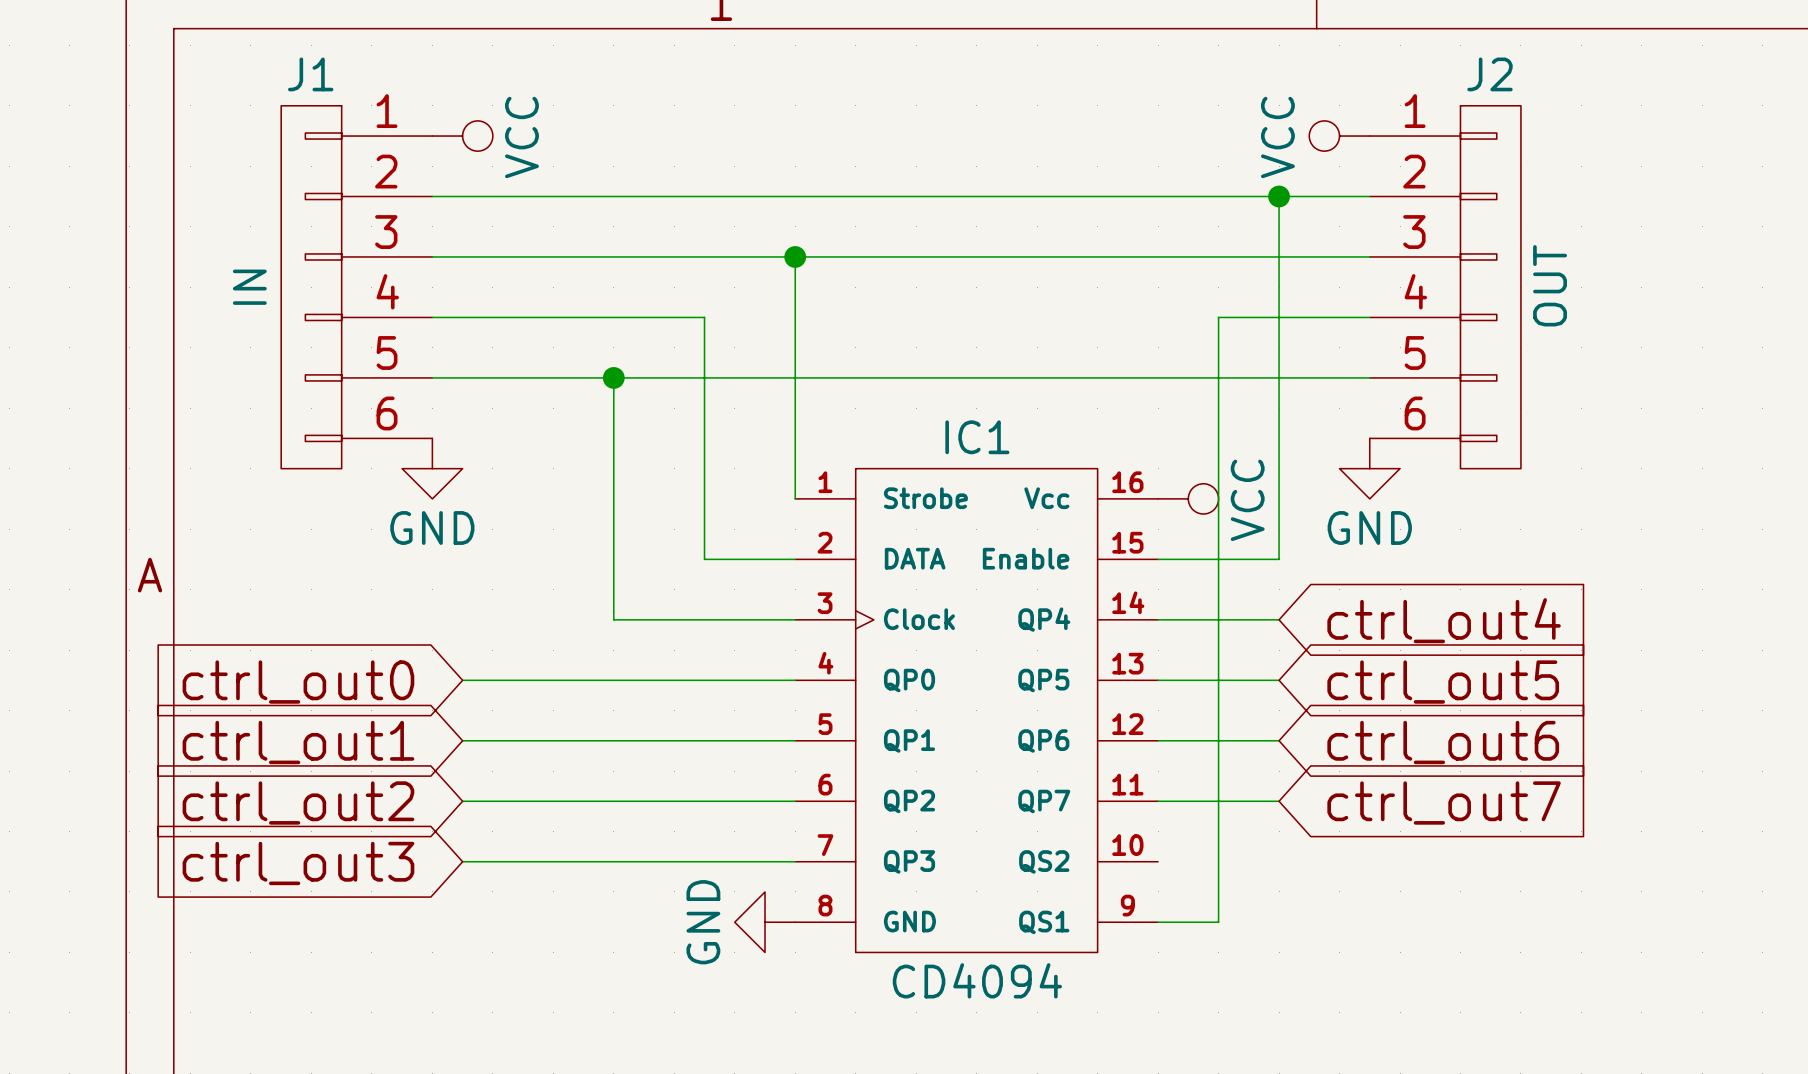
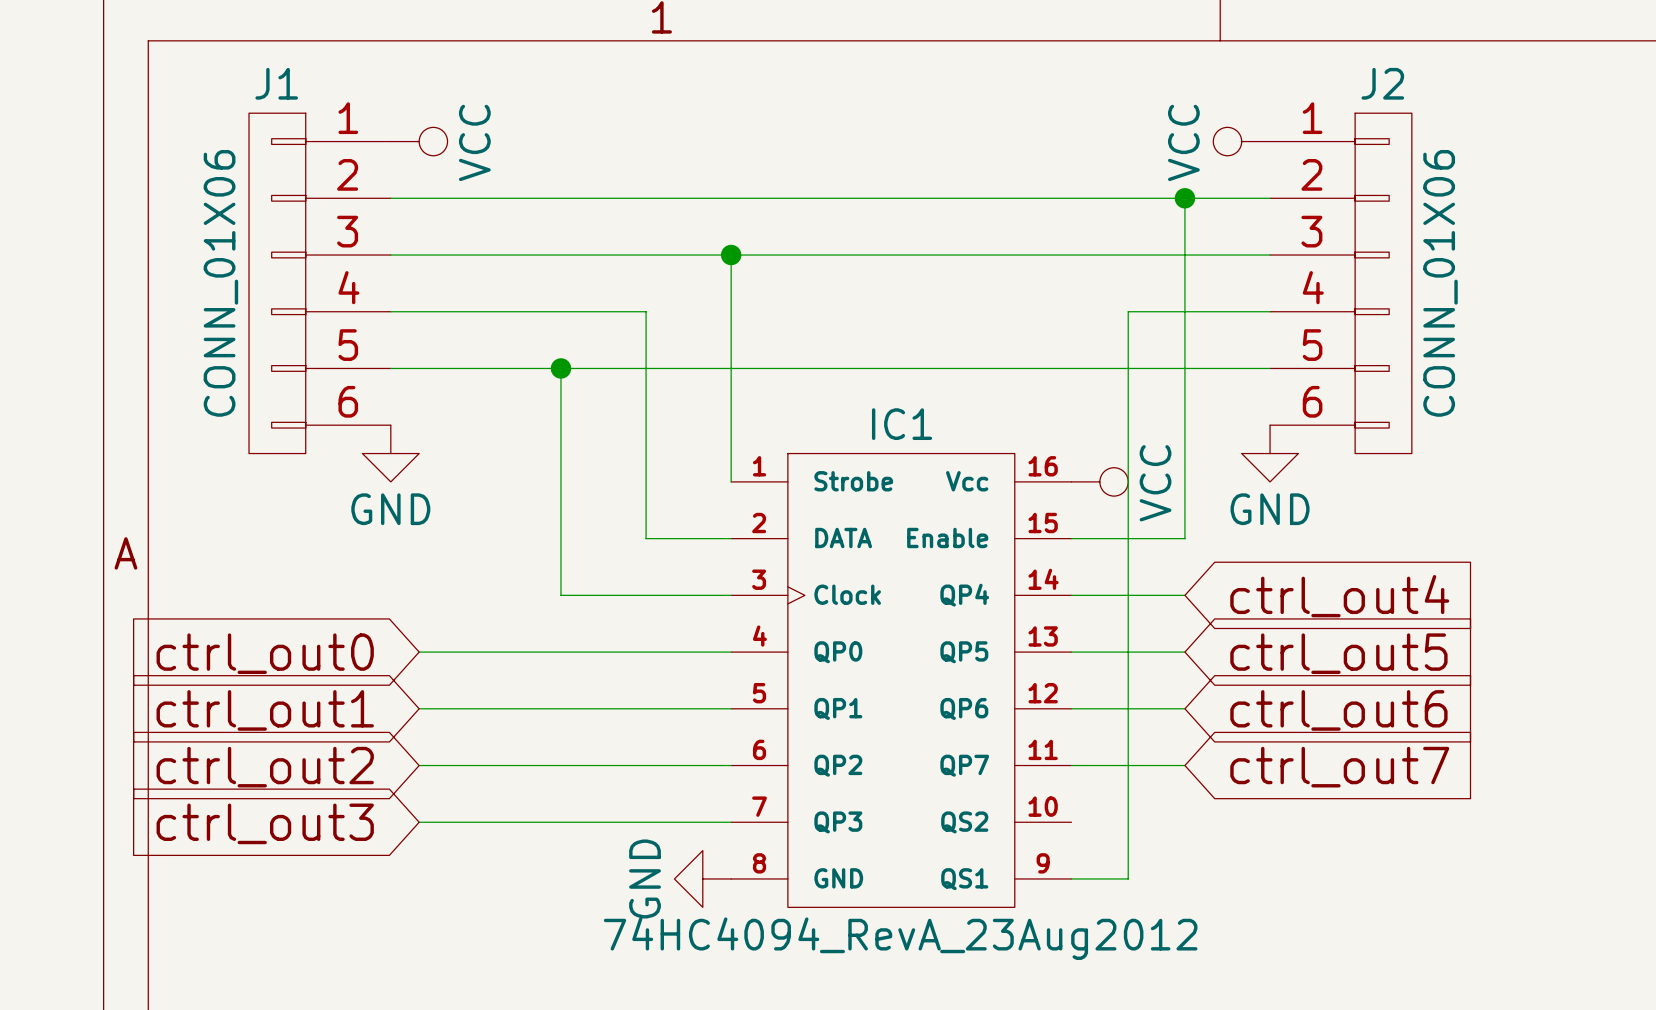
J2 value: OUT (1550, 285) -> CONN_01X06 (1440, 283)
J1 value: IN (249, 287) -> CONN_01X06 (220, 283)
IC1 value: CD4094 (977, 980) -> 74HC4094_RevA_23Aug2012 (900, 938)

